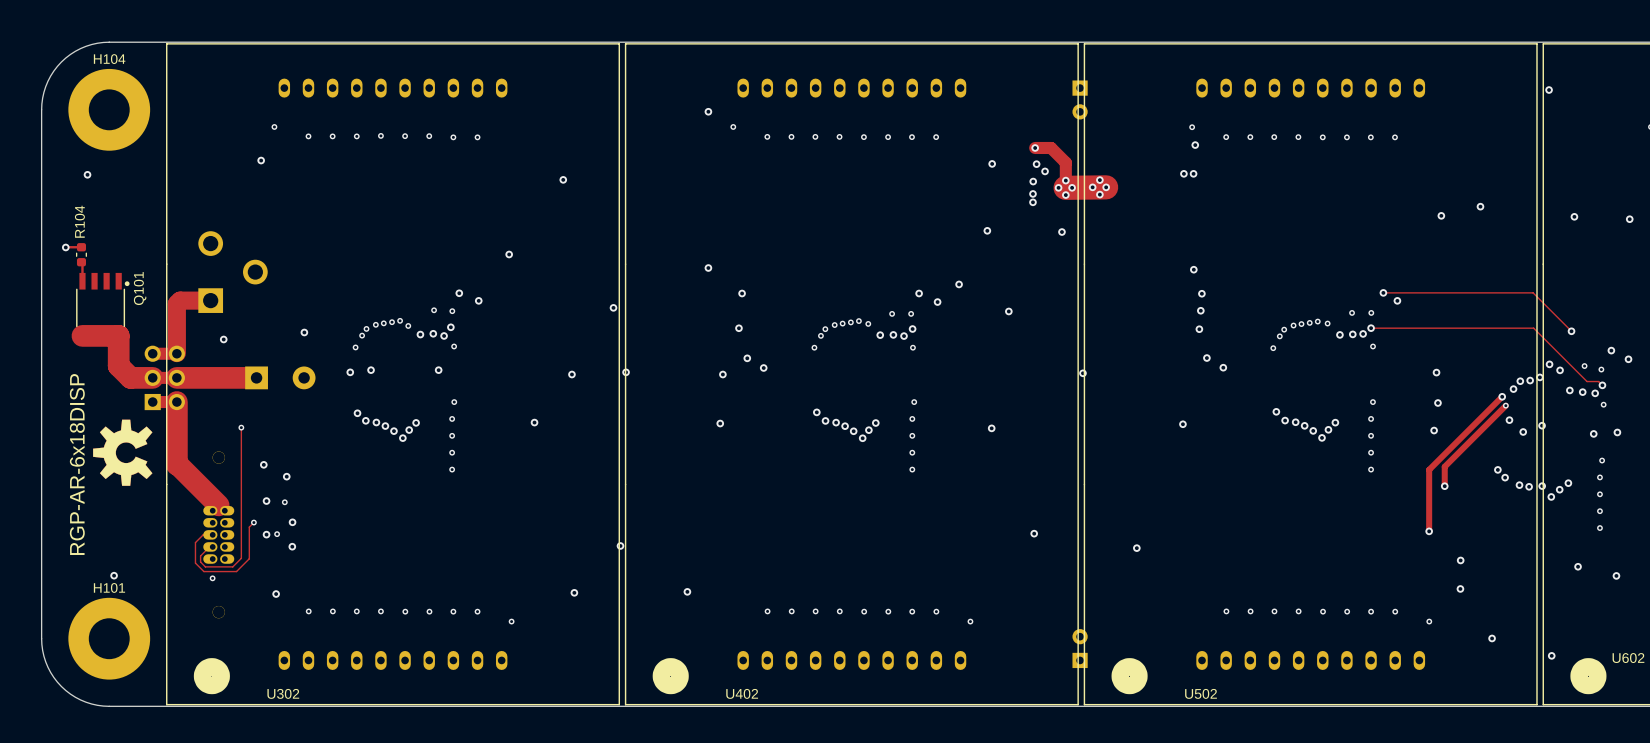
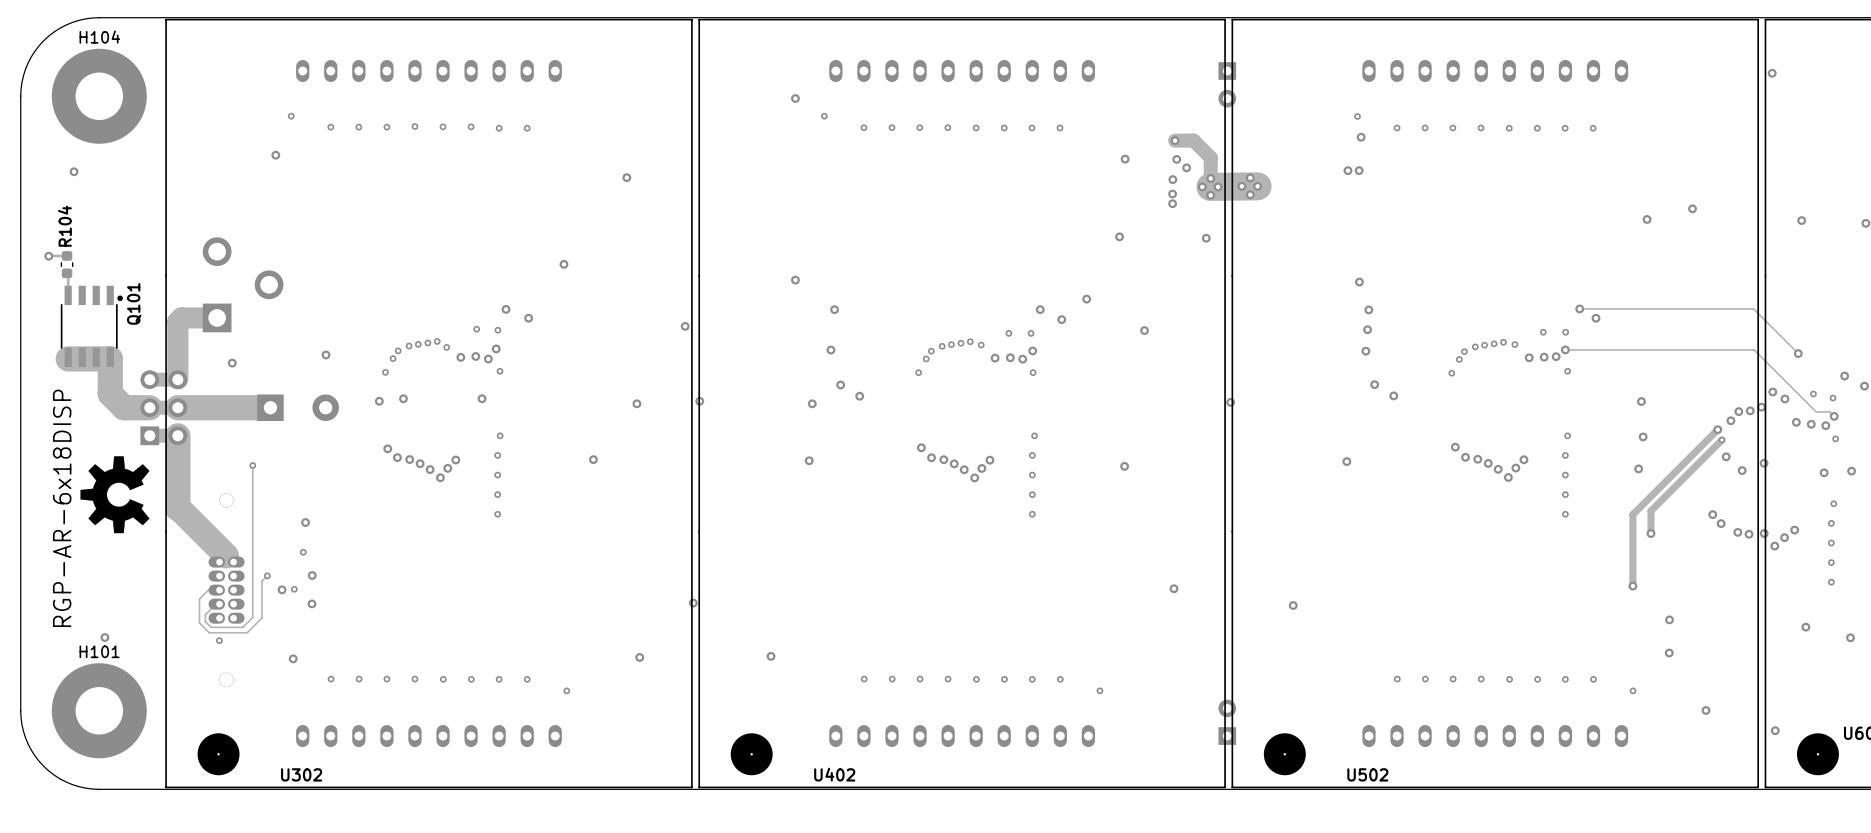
via: (263, 464) -> none
via: (266, 501) -> none

